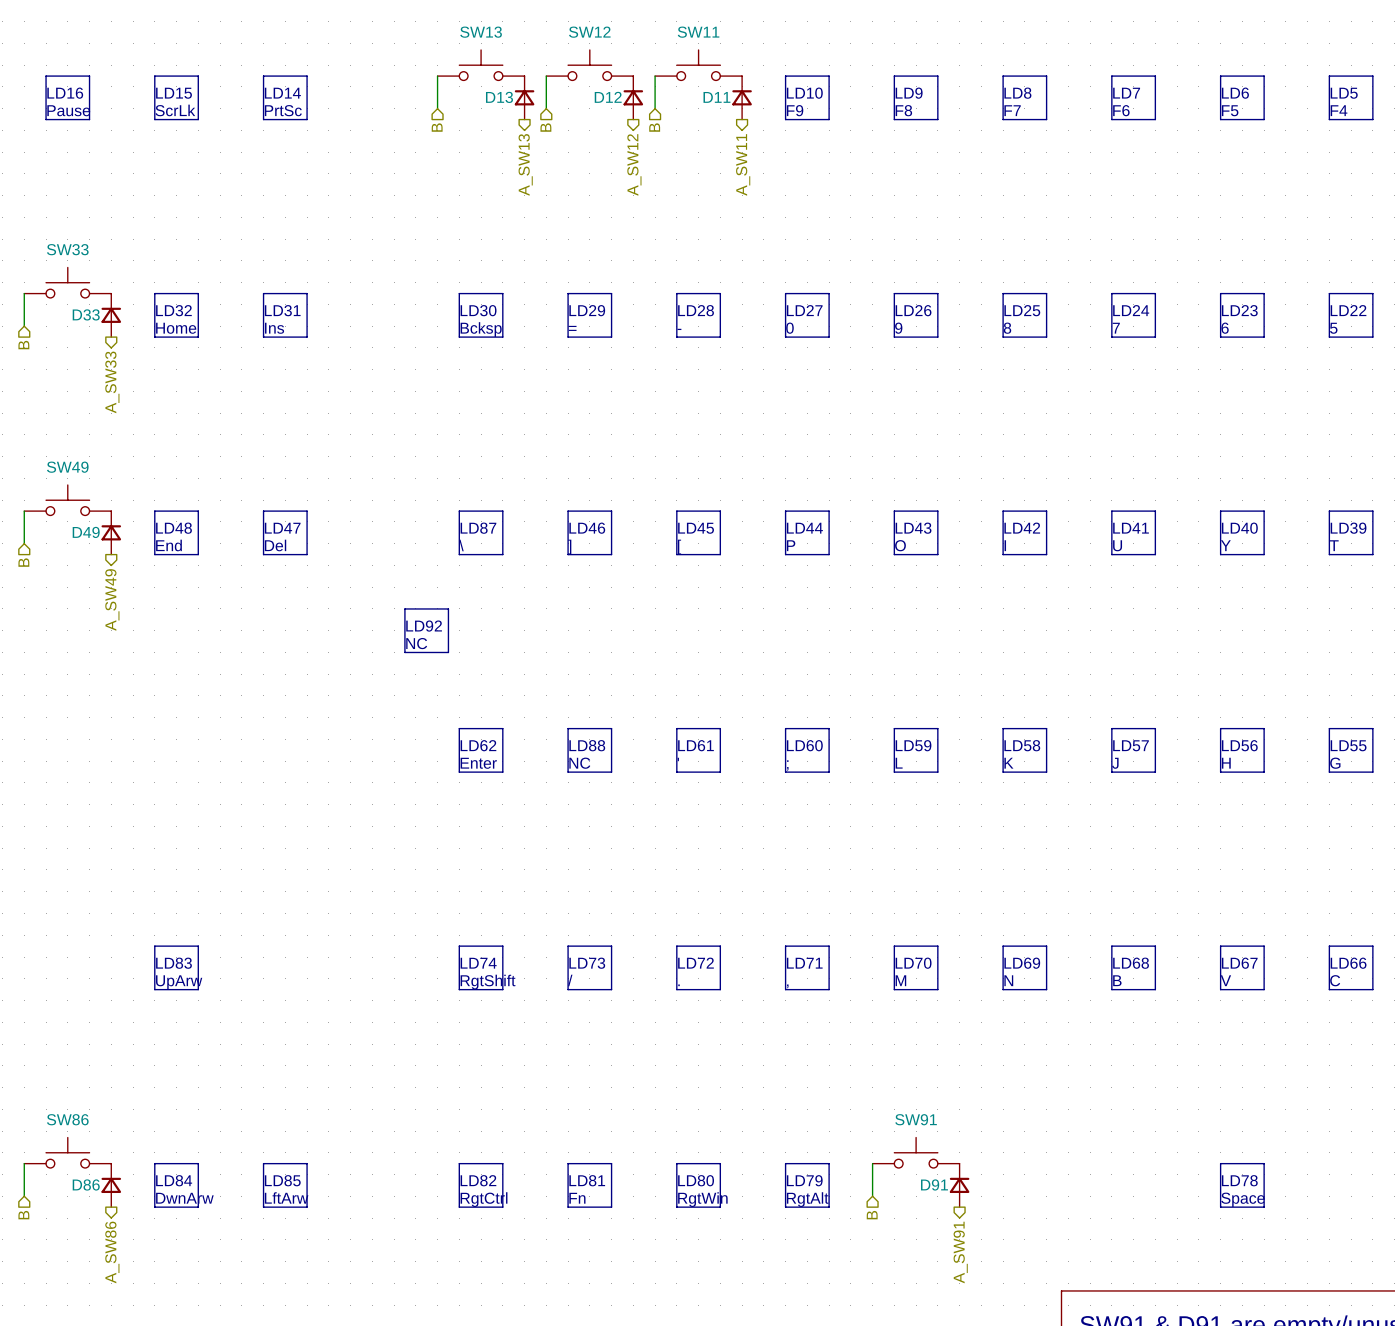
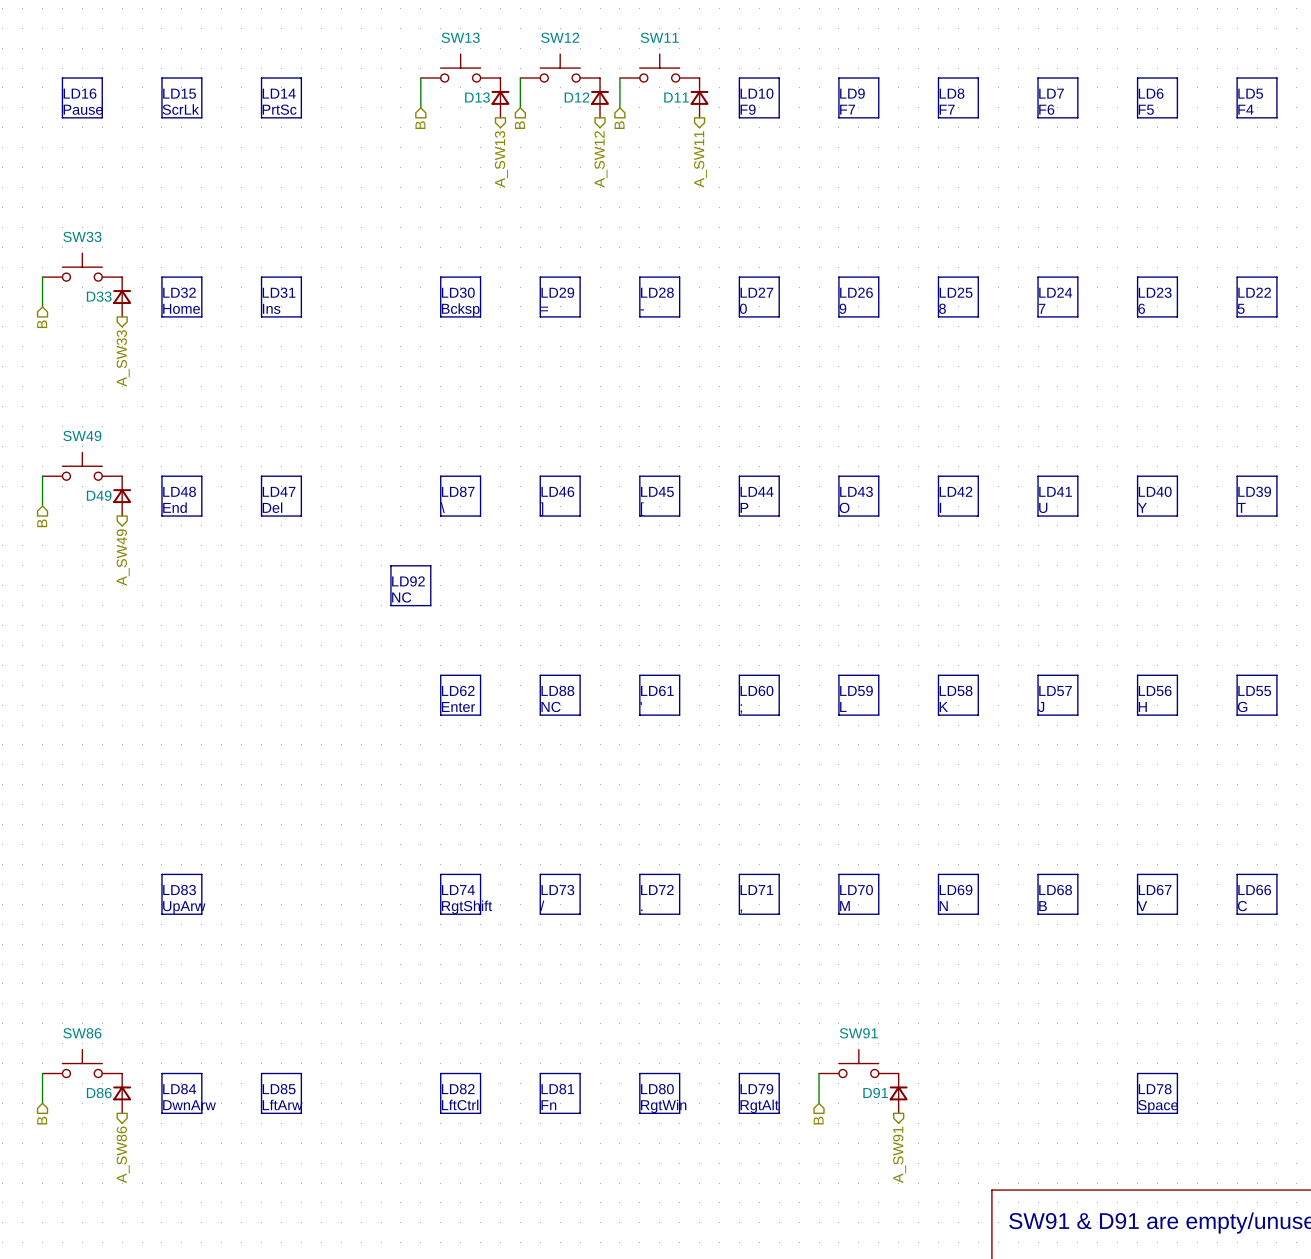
text: F8 (903, 110) -> F7 (847, 109)
text: RgtCtrl (484, 1199) -> LftCtrl (460, 1104)

